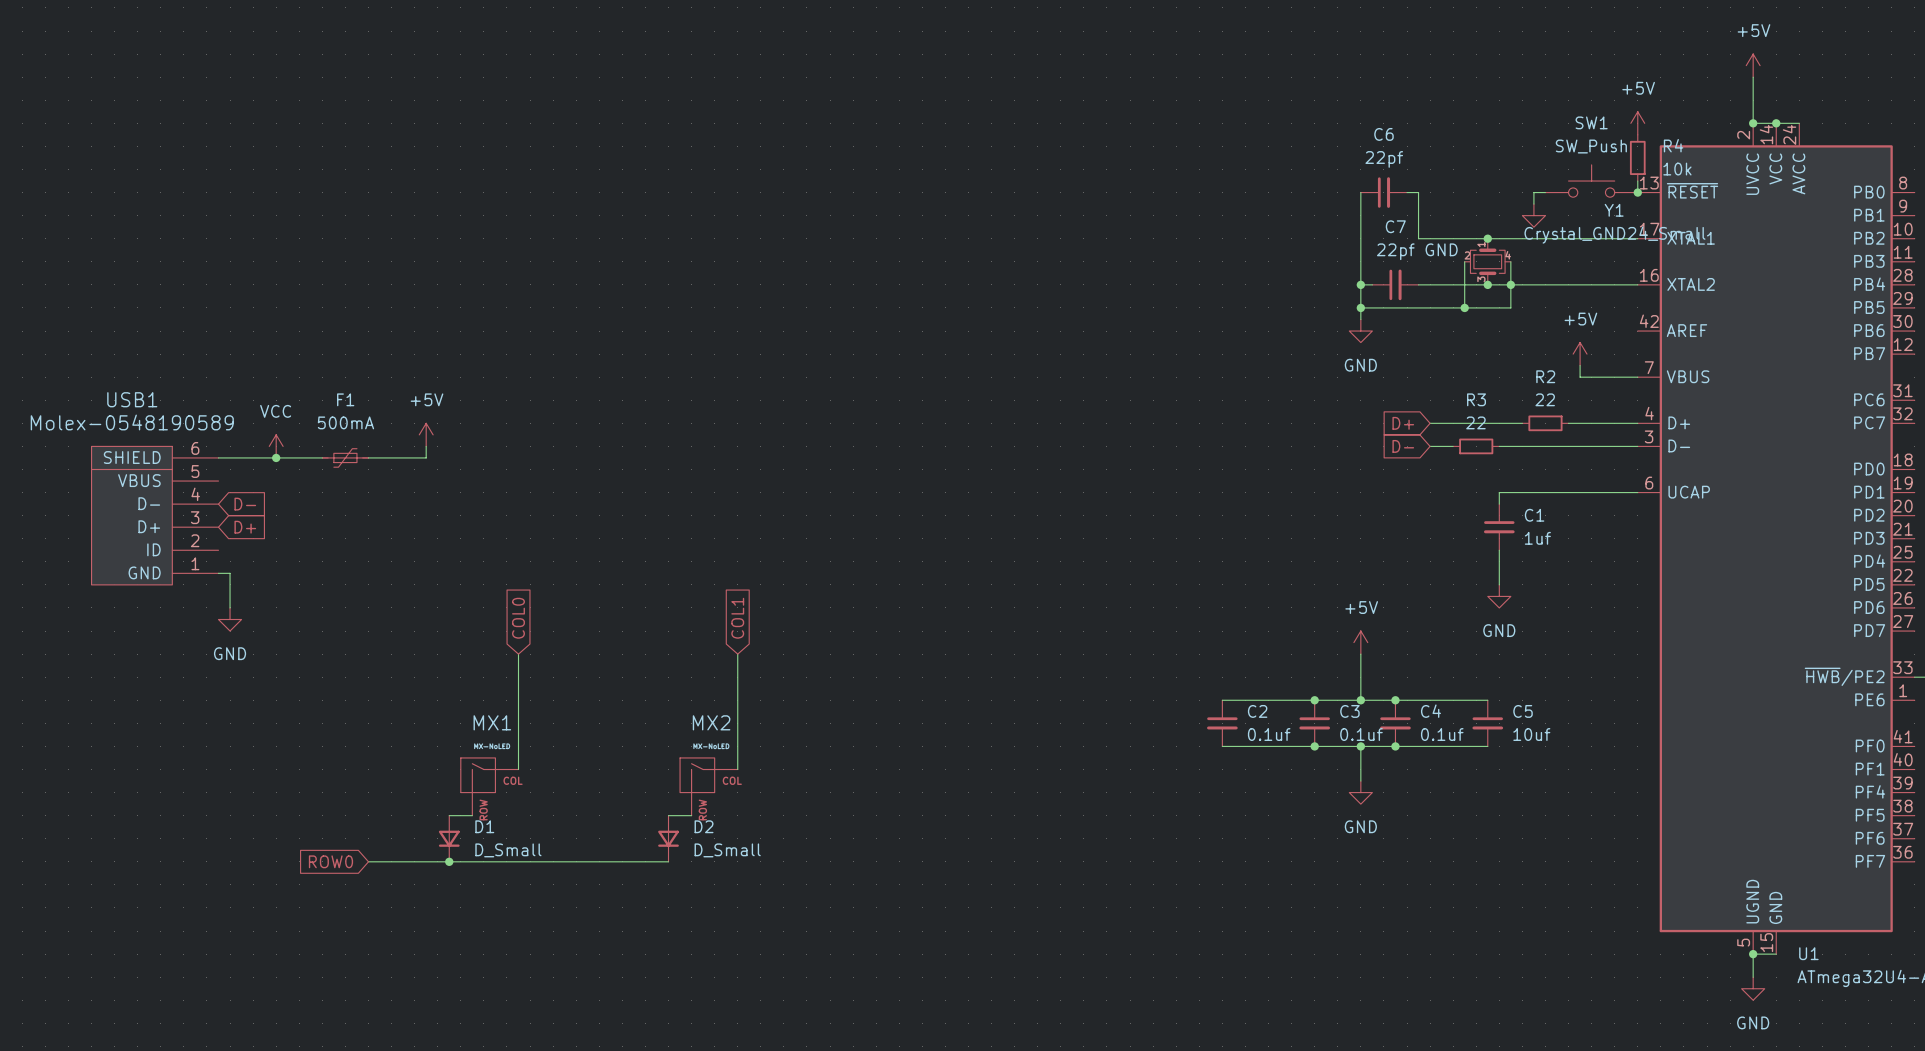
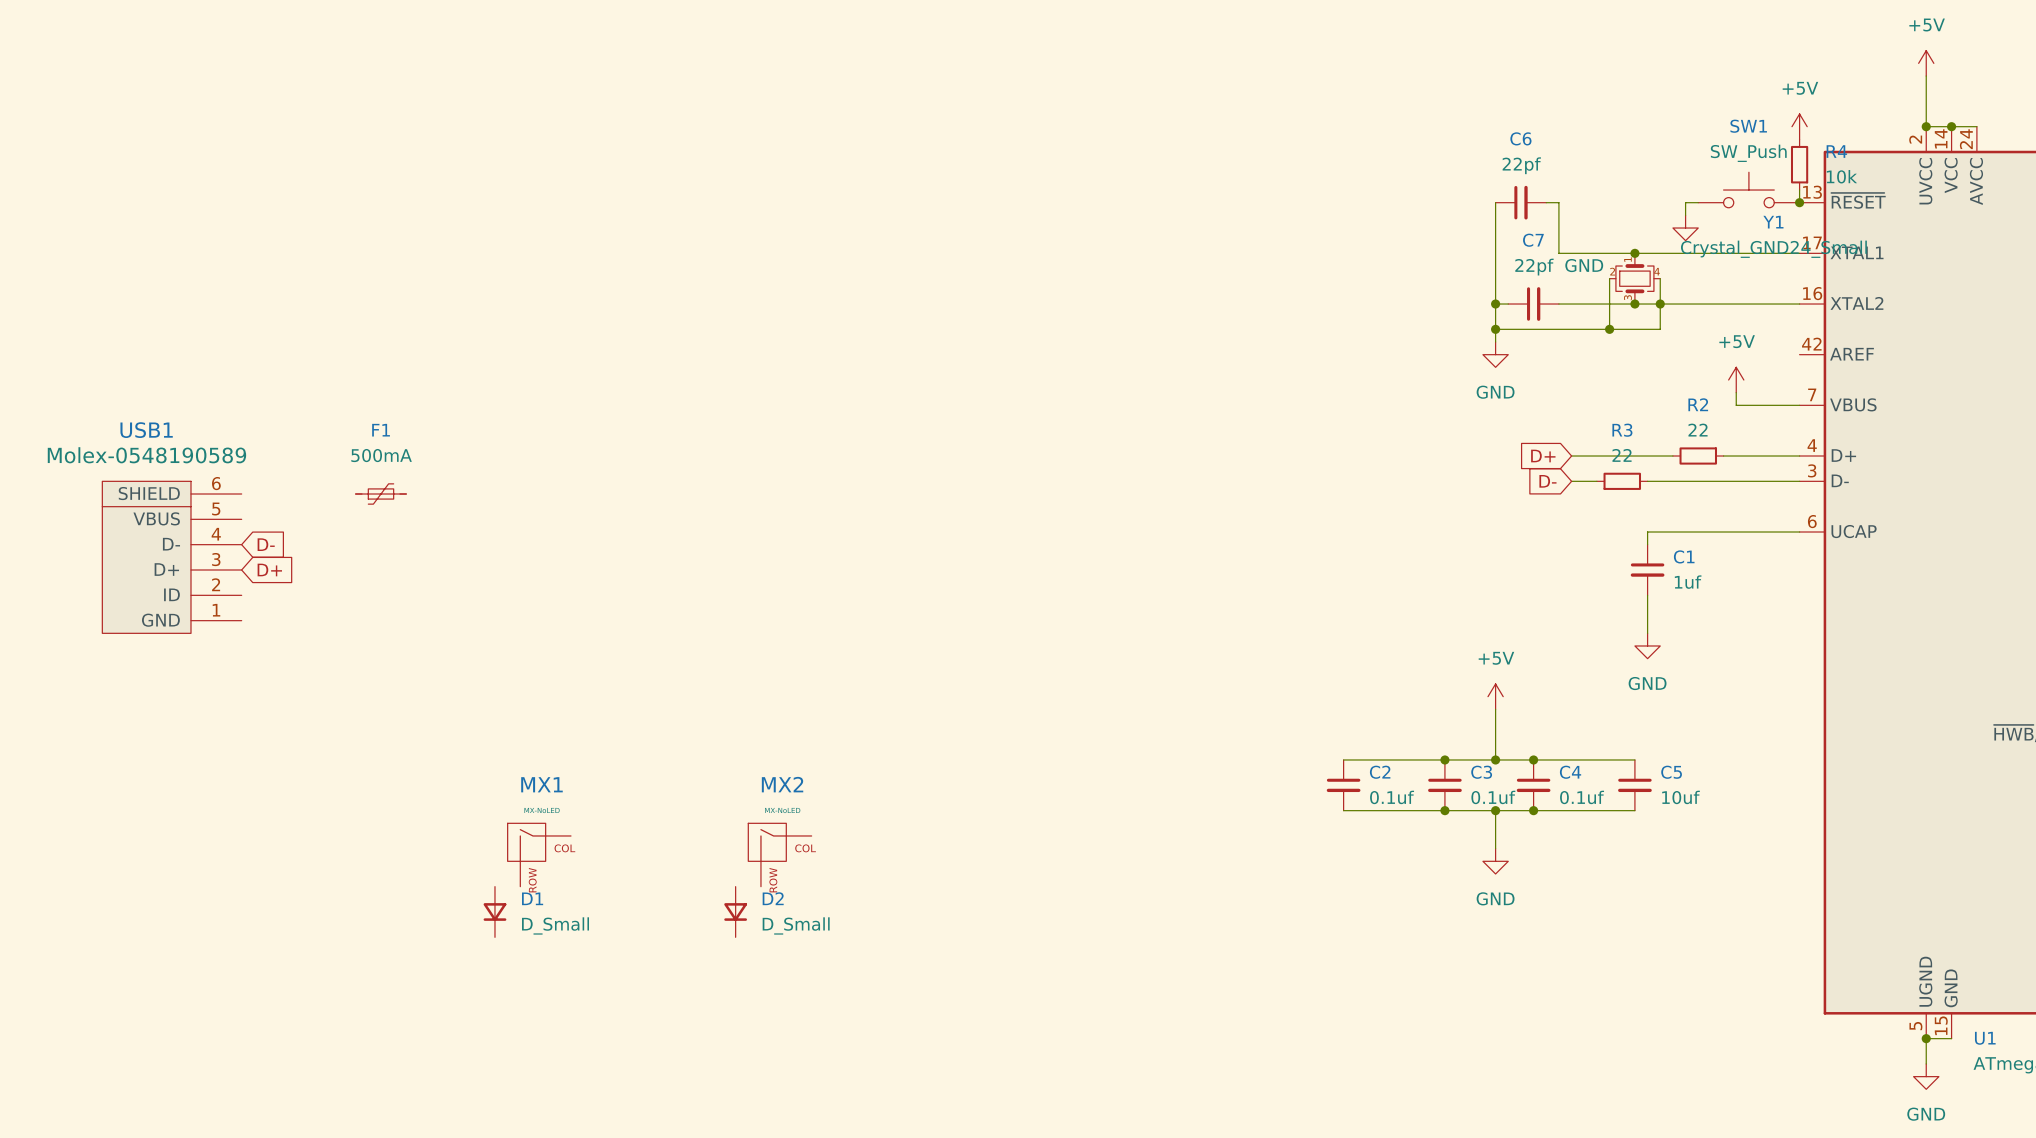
power symbol: +5V (426, 434) -> none
power symbol: VCC (276, 446) -> none
wire: (426, 446) (426, 457) (368, 457) -> none
wire: (218, 457) (322, 457) -> none
junction: (276, 457) -> none
wire: (218, 573) (230, 573) (230, 607) -> none
global label: COL0 (518, 618) -> none
global label: COL1 (737, 618) -> none
power symbol: GND (230, 619) -> none
wire: (518, 654) (518, 769) -> none
wire: (737, 654) (737, 769) -> none
wire: (449, 815) (472, 815) -> none
wire: (668, 815) (691, 815) -> none
global label: ROW0 (330, 861) -> none
wire: (368, 861) (668, 861) -> none
junction: (449, 861) -> none

